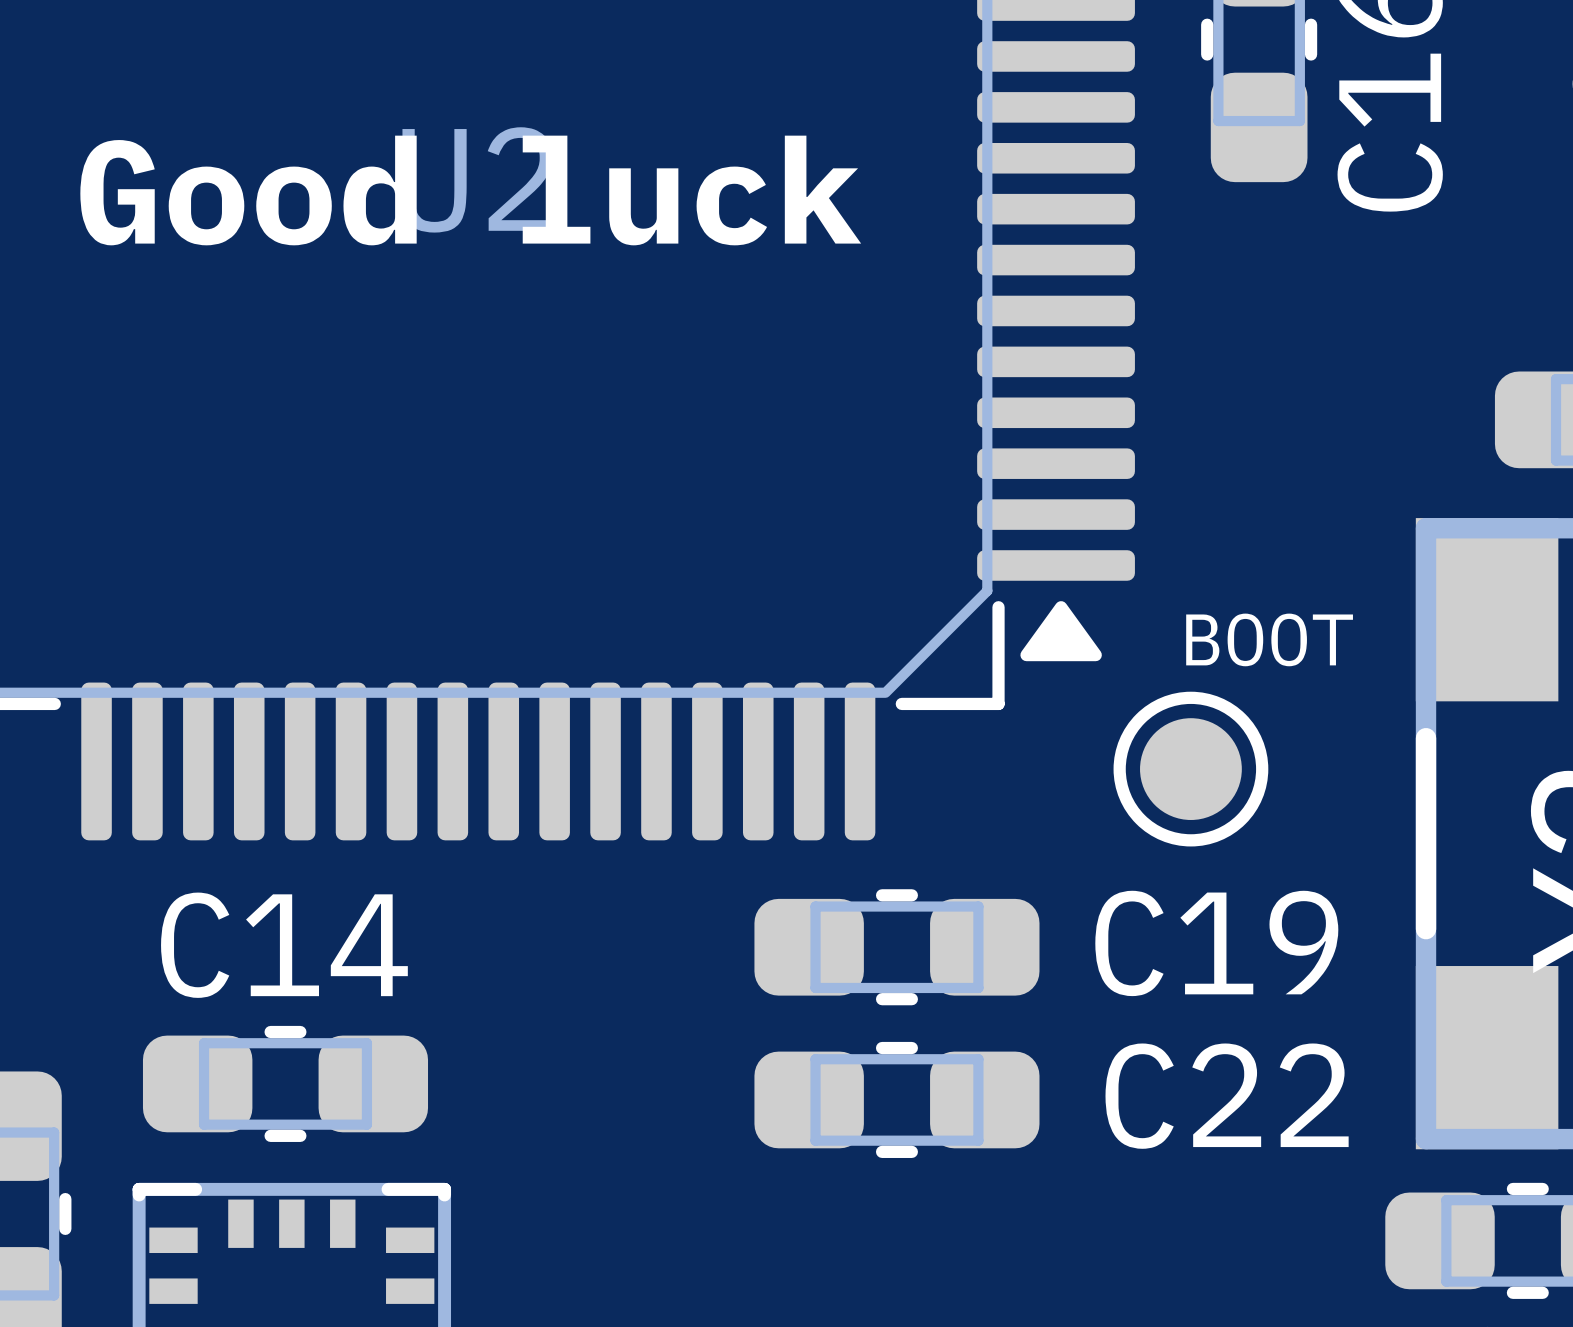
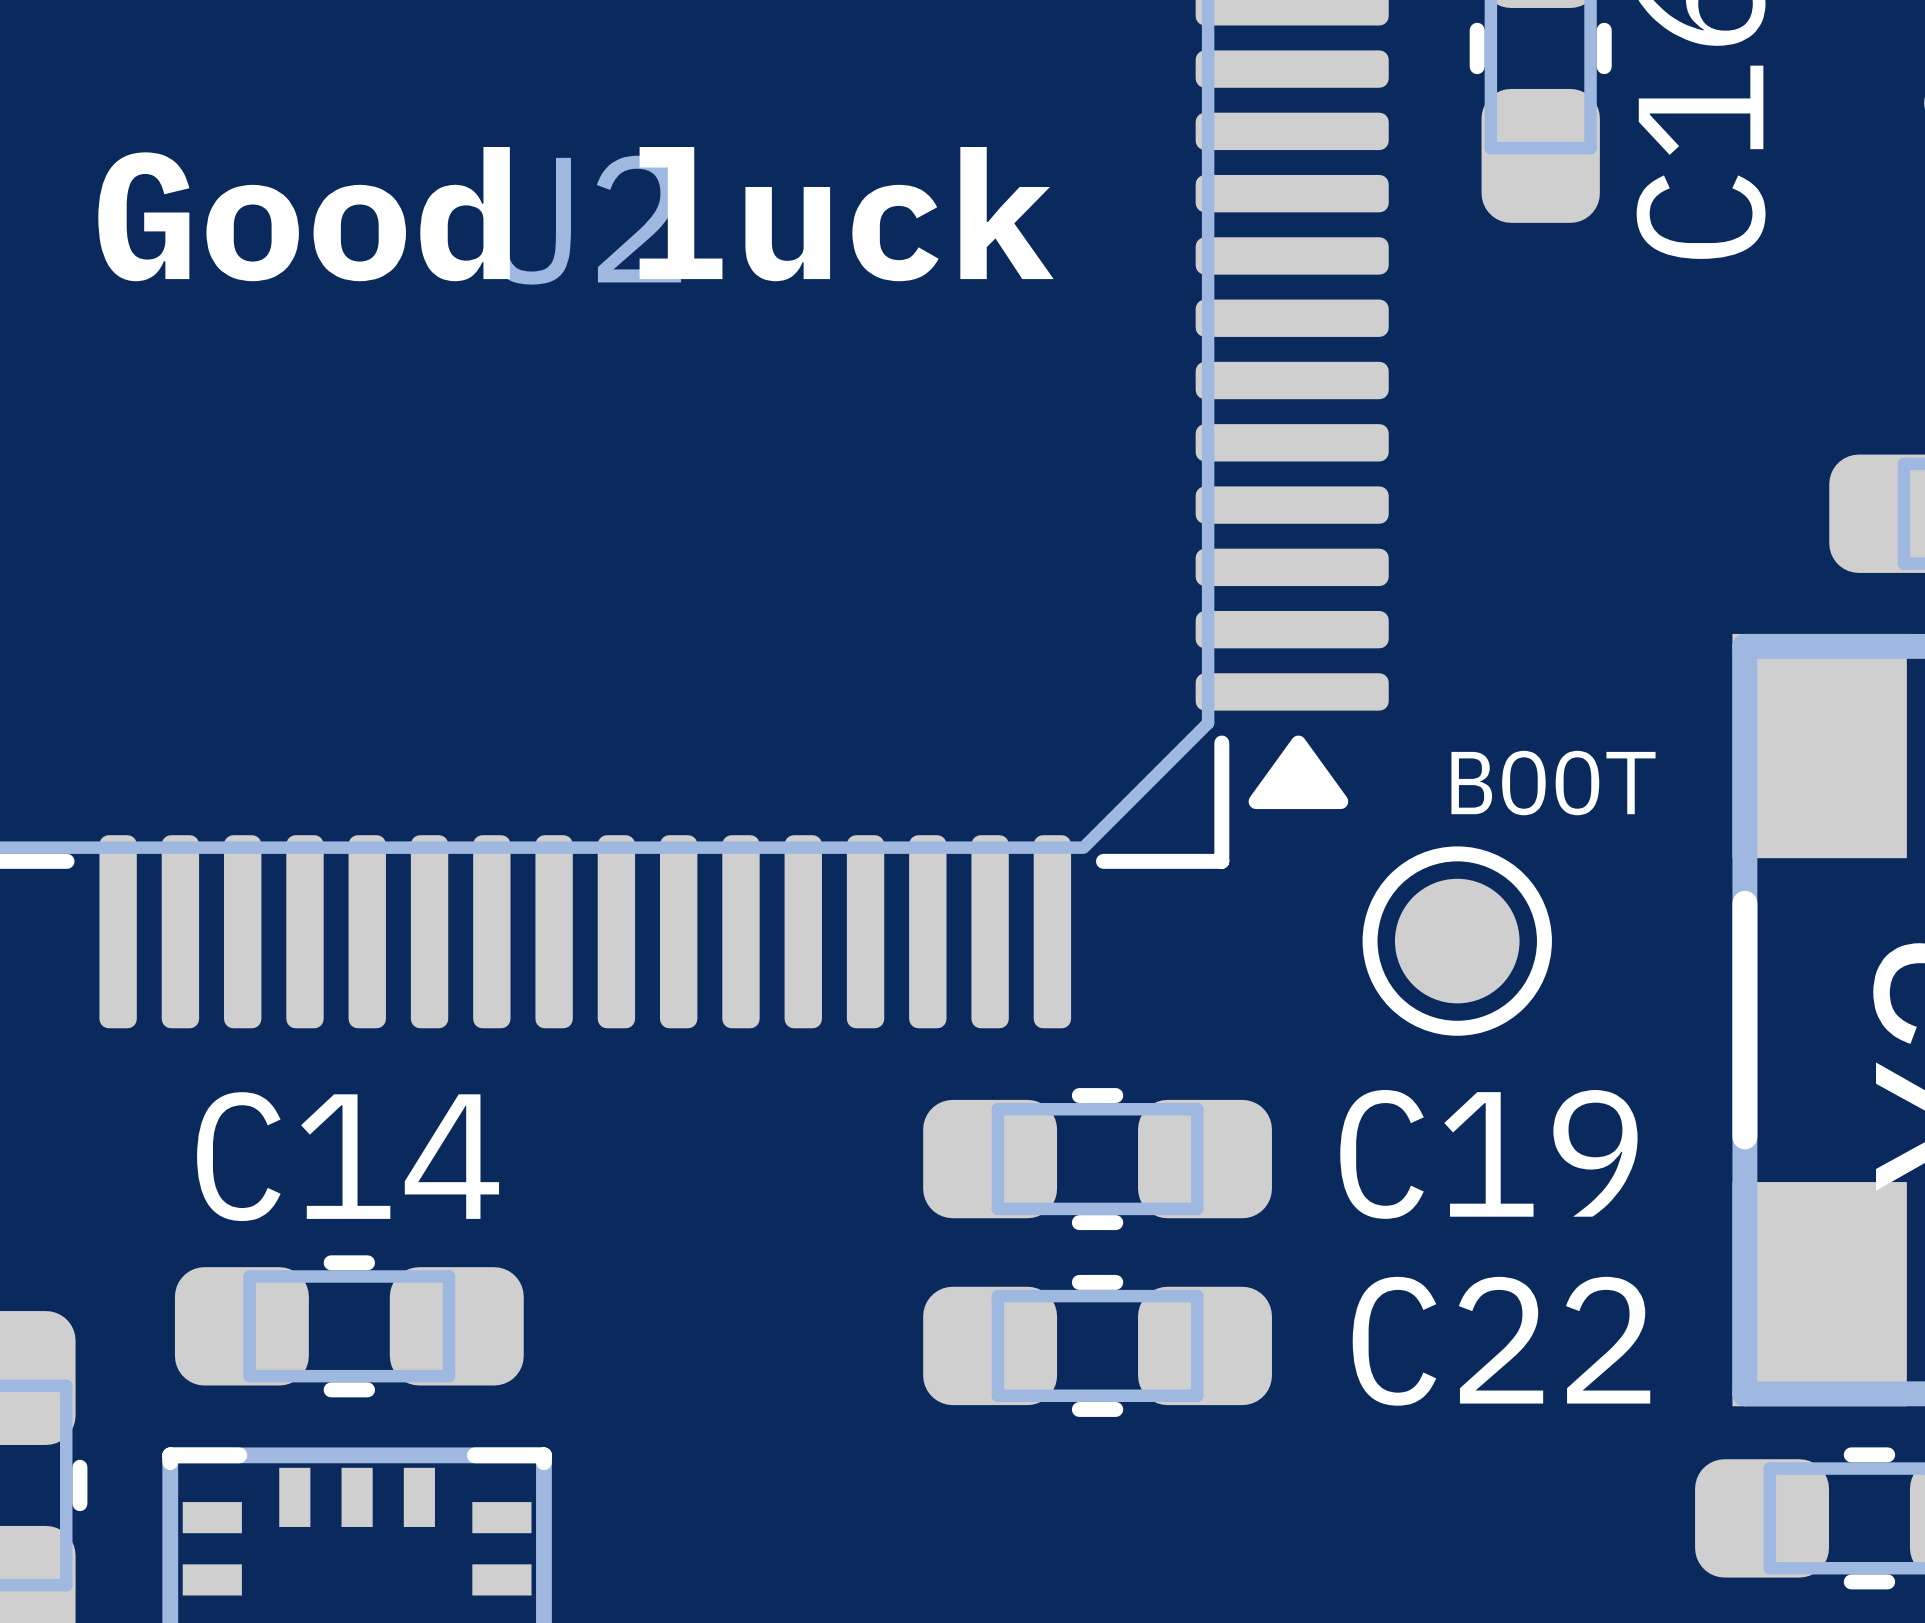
text position: Good luck (470, 190) -> Good luck (575, 214)

